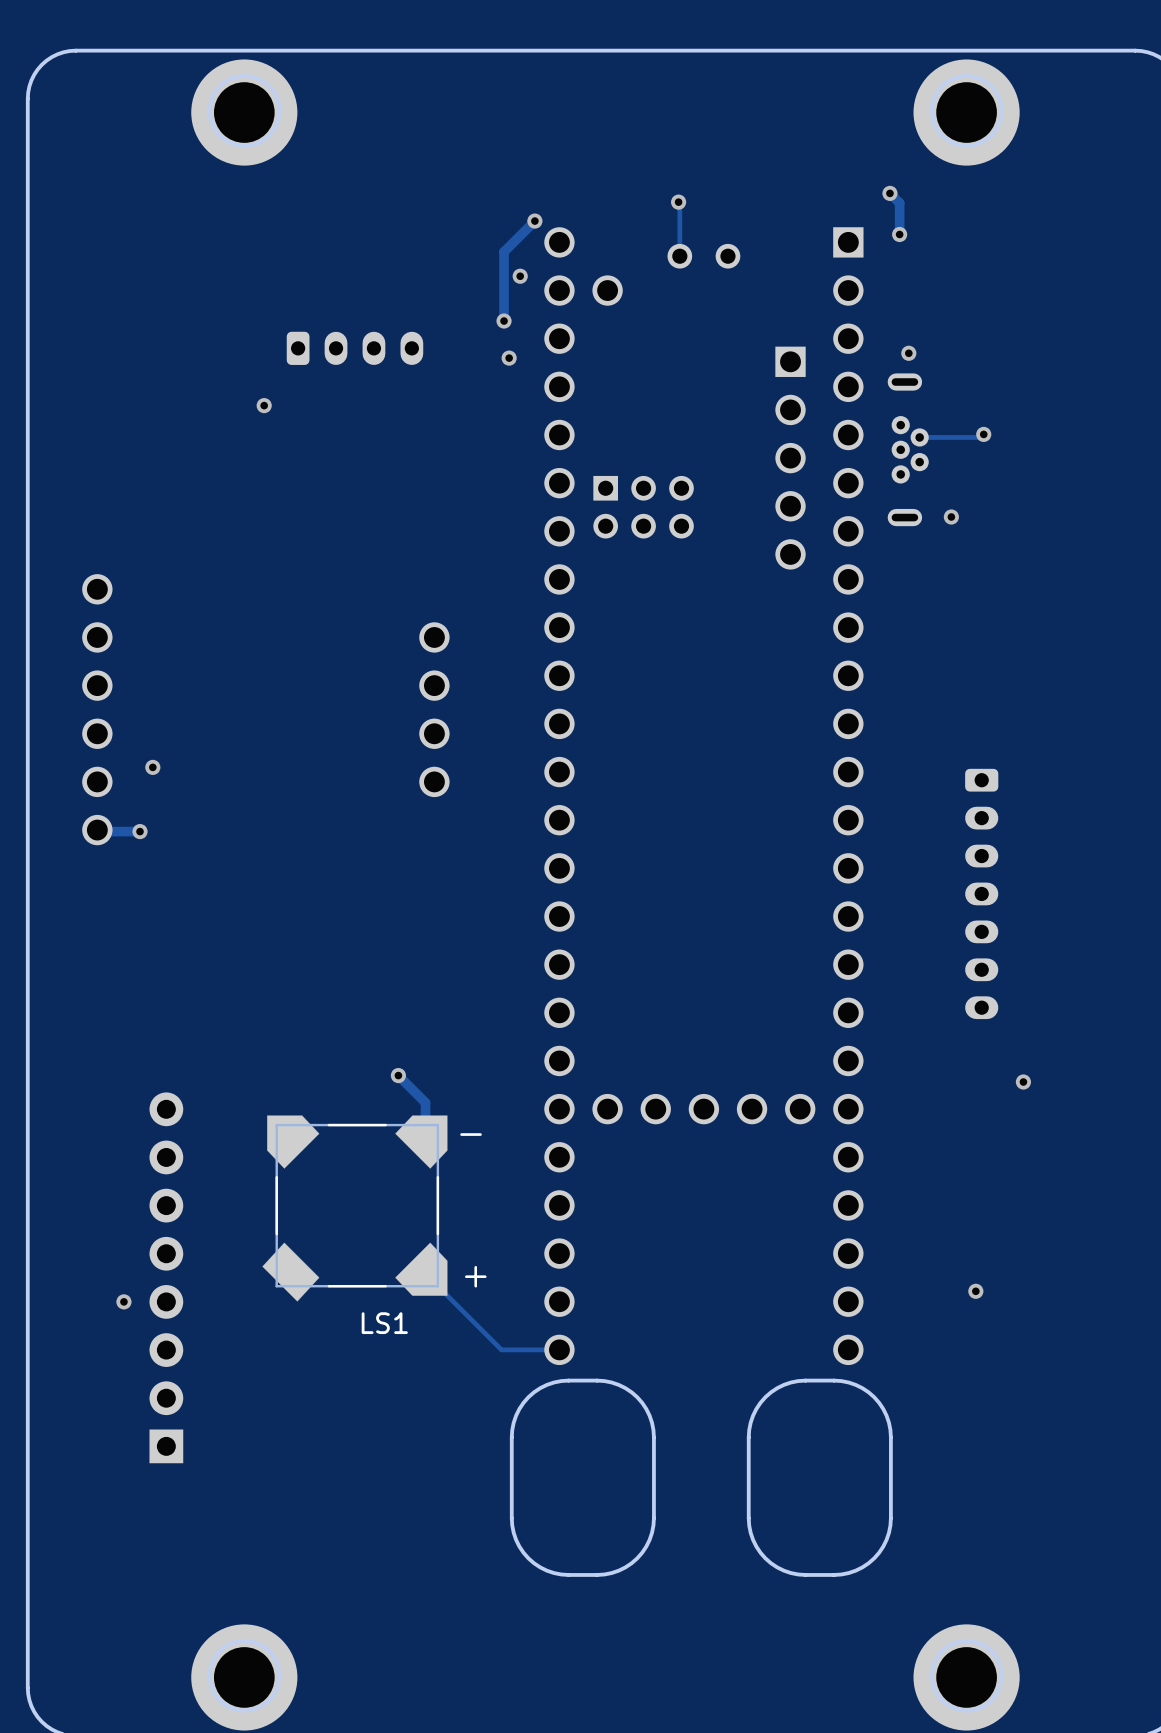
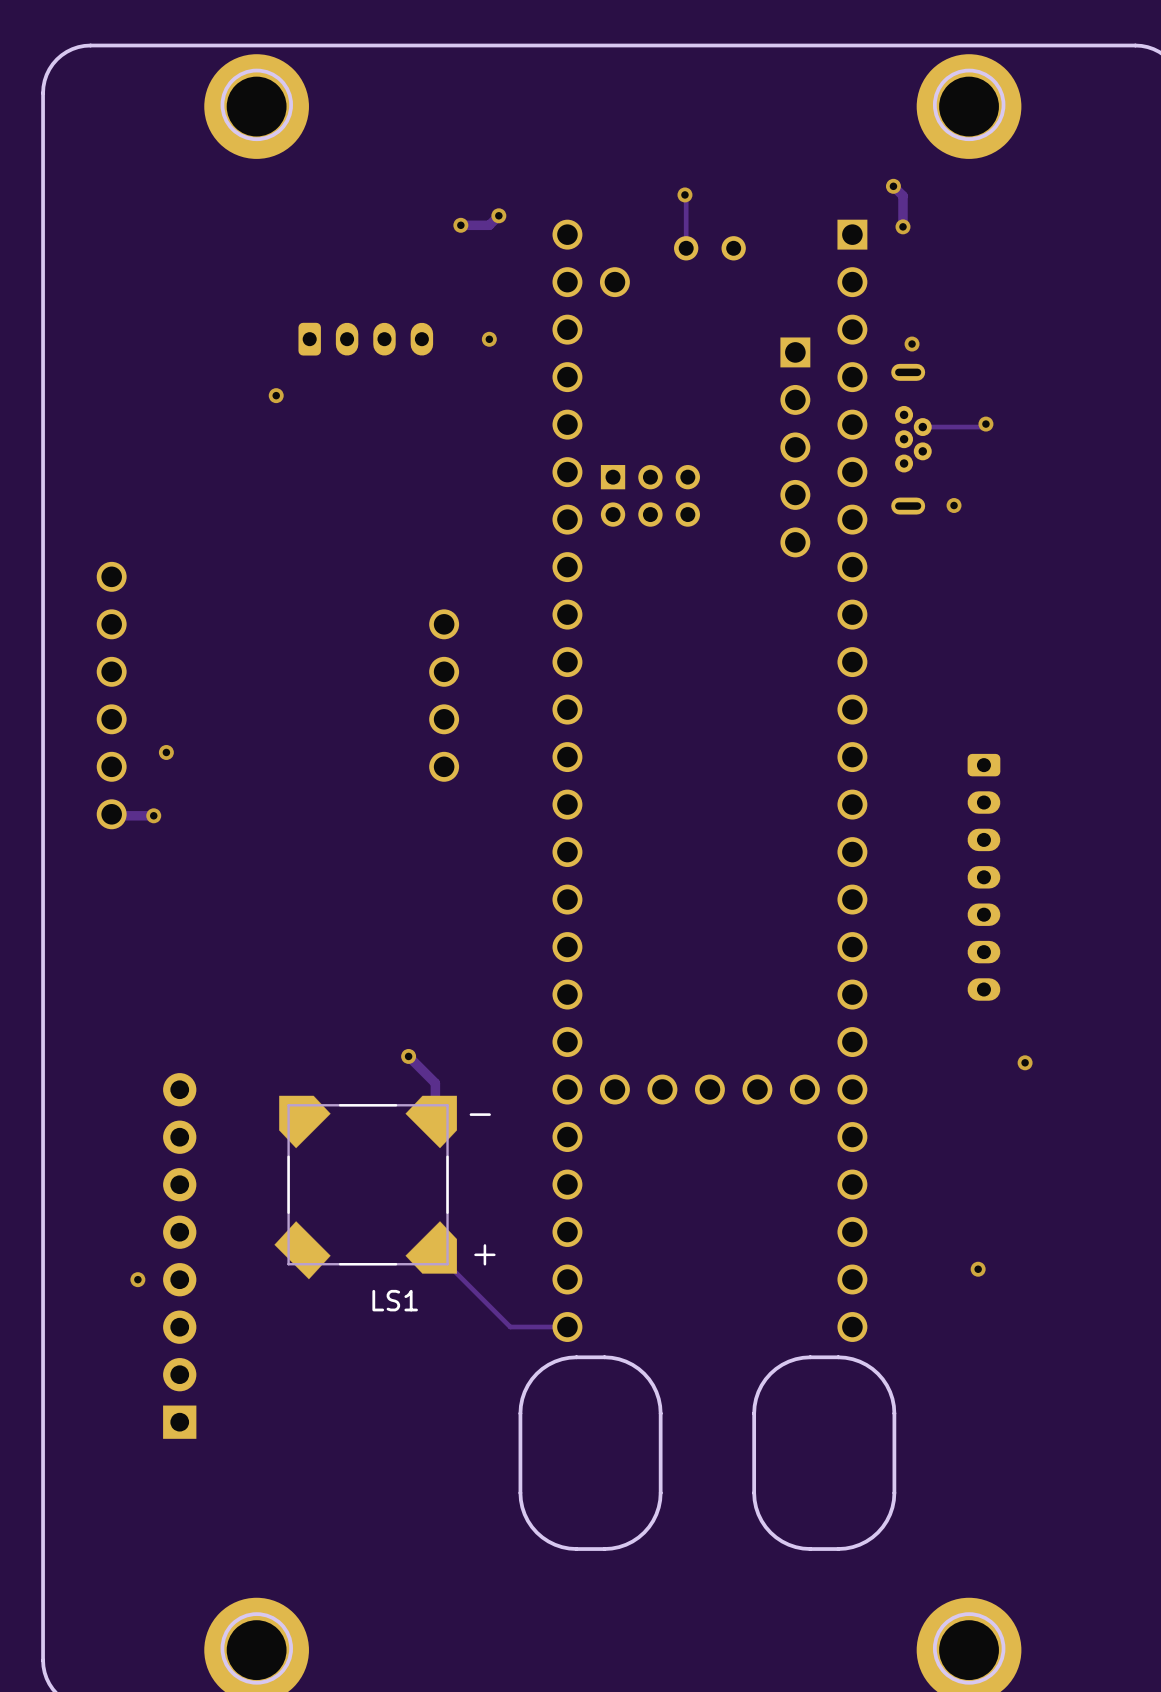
track: (534, 221) (504, 251) (503, 322) -> none
via: (534, 221) -> none
track: none -> (498, 215) (489, 225) (460, 225)
via: none -> (498, 215)
via: none -> (460, 225)
via: (520, 276) -> none
via: (504, 321) -> none
via: none -> (489, 339)
via: (509, 358) -> none

